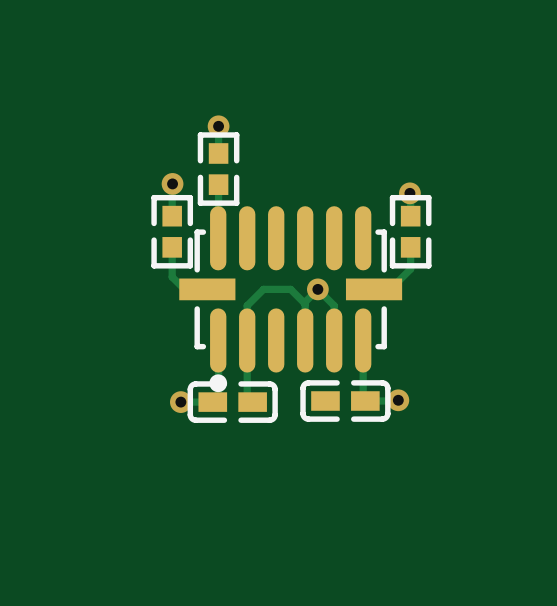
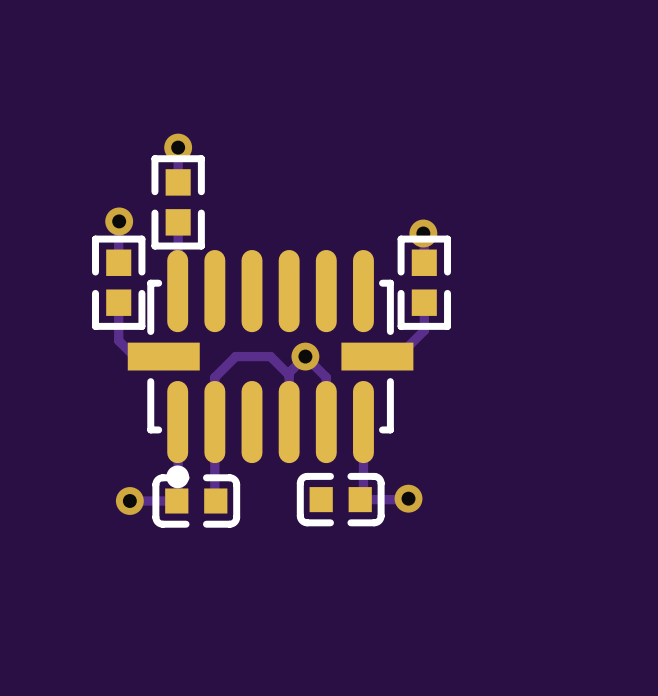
part footprint: [300, 380, 391, 422] -> [296, 472, 385, 527]
part footprint: [187, 381, 278, 423] -> [152, 474, 241, 528]

